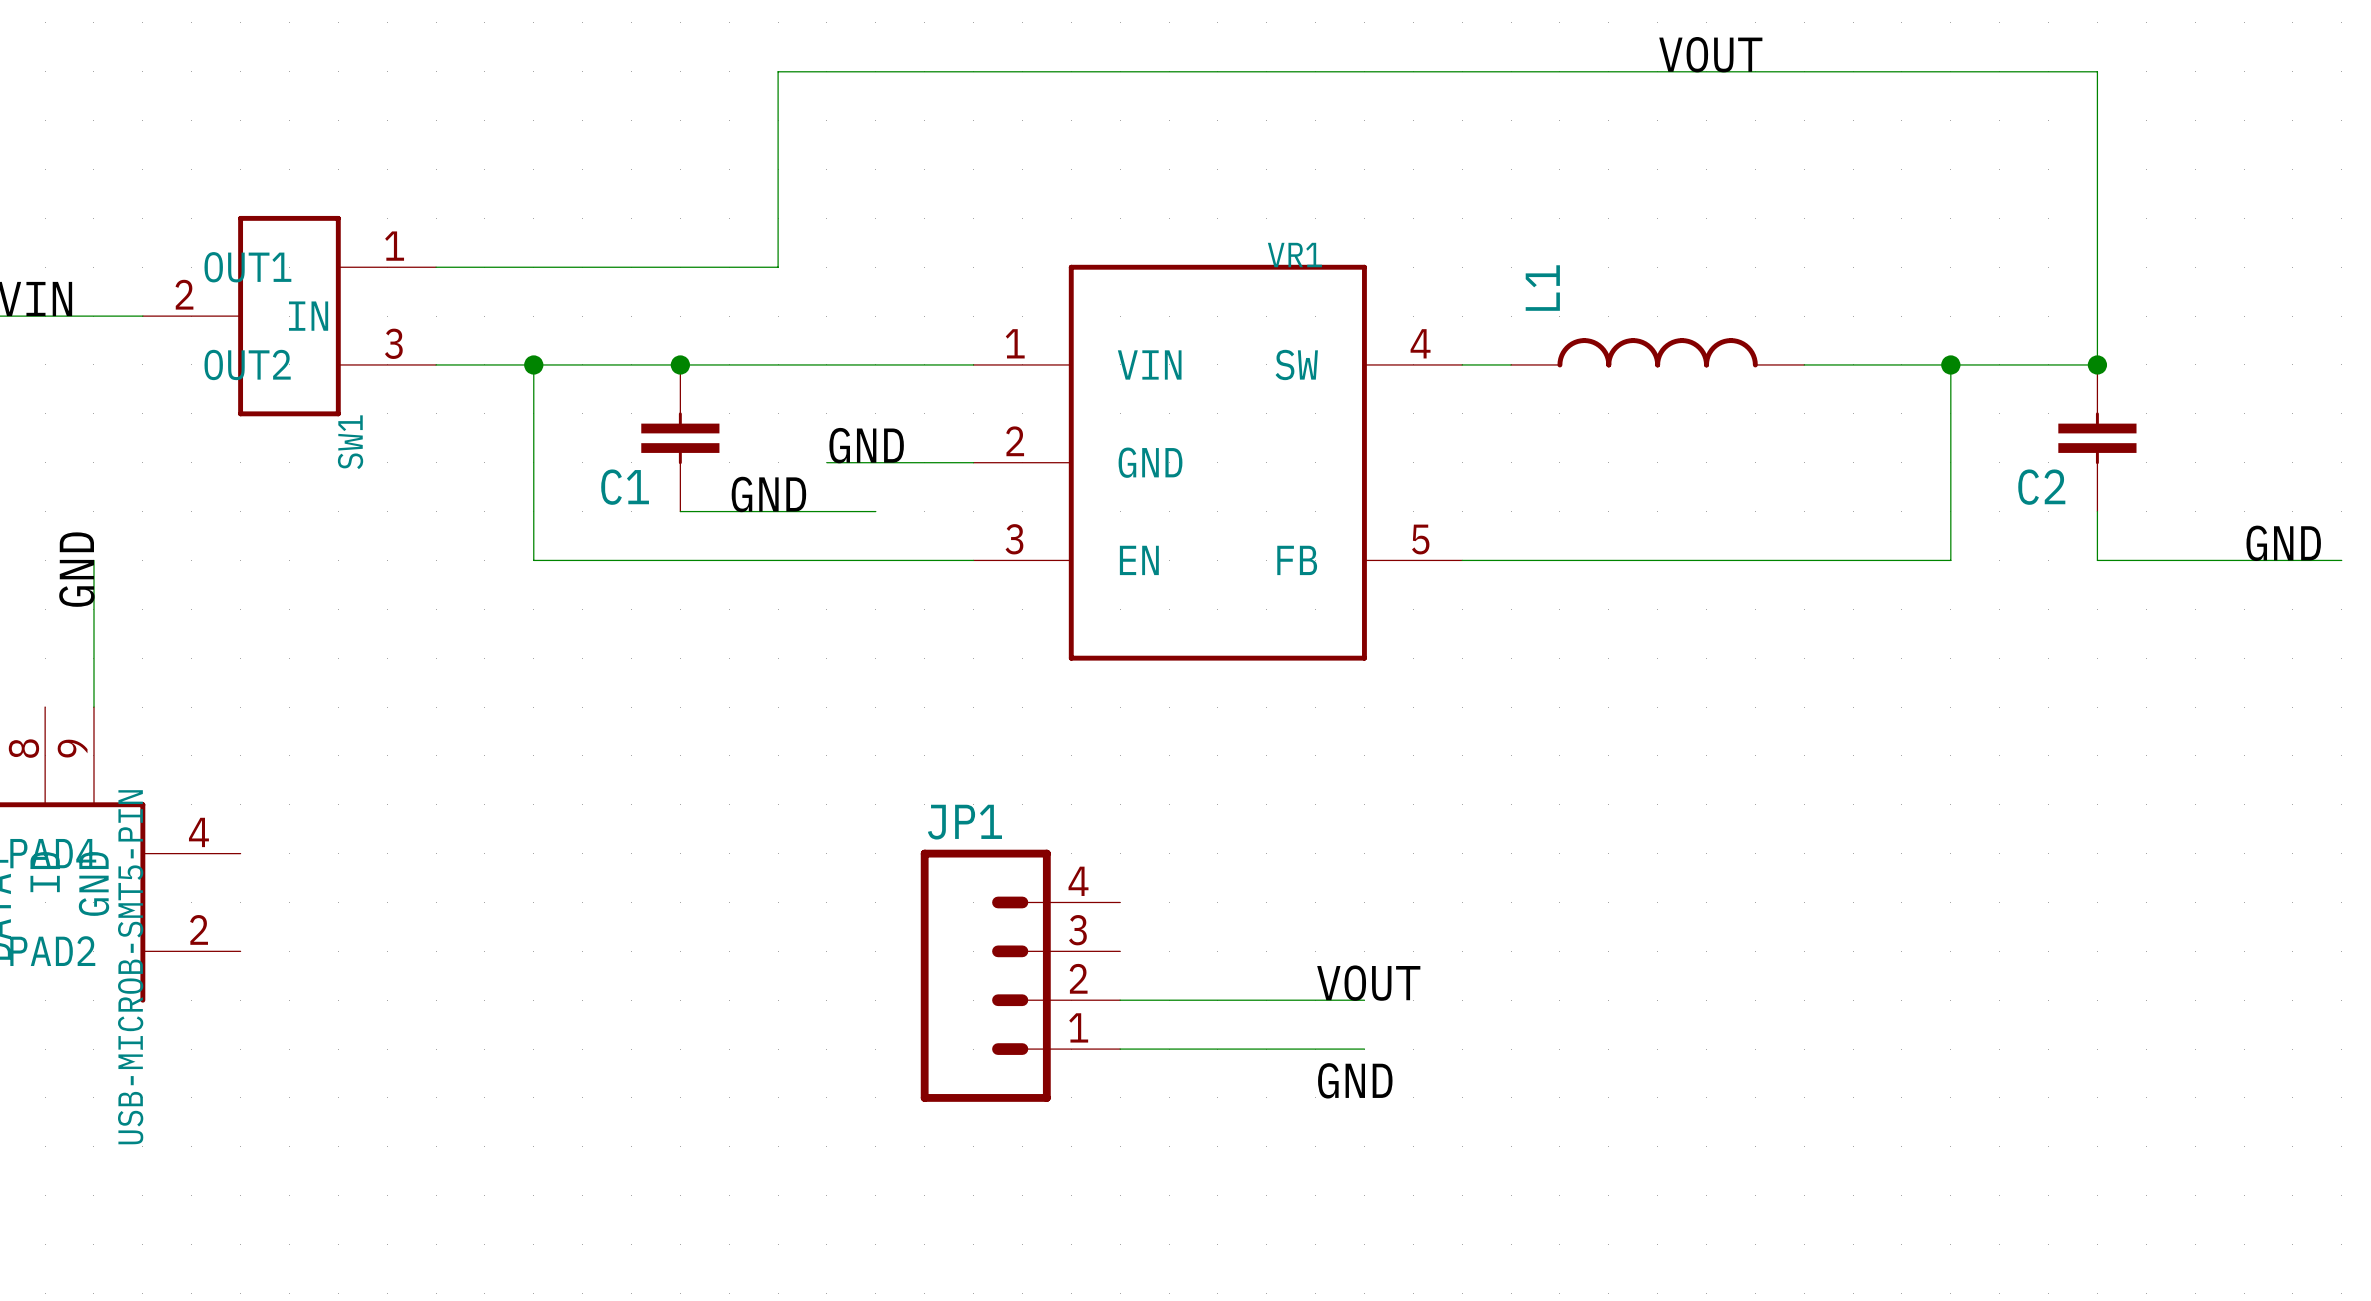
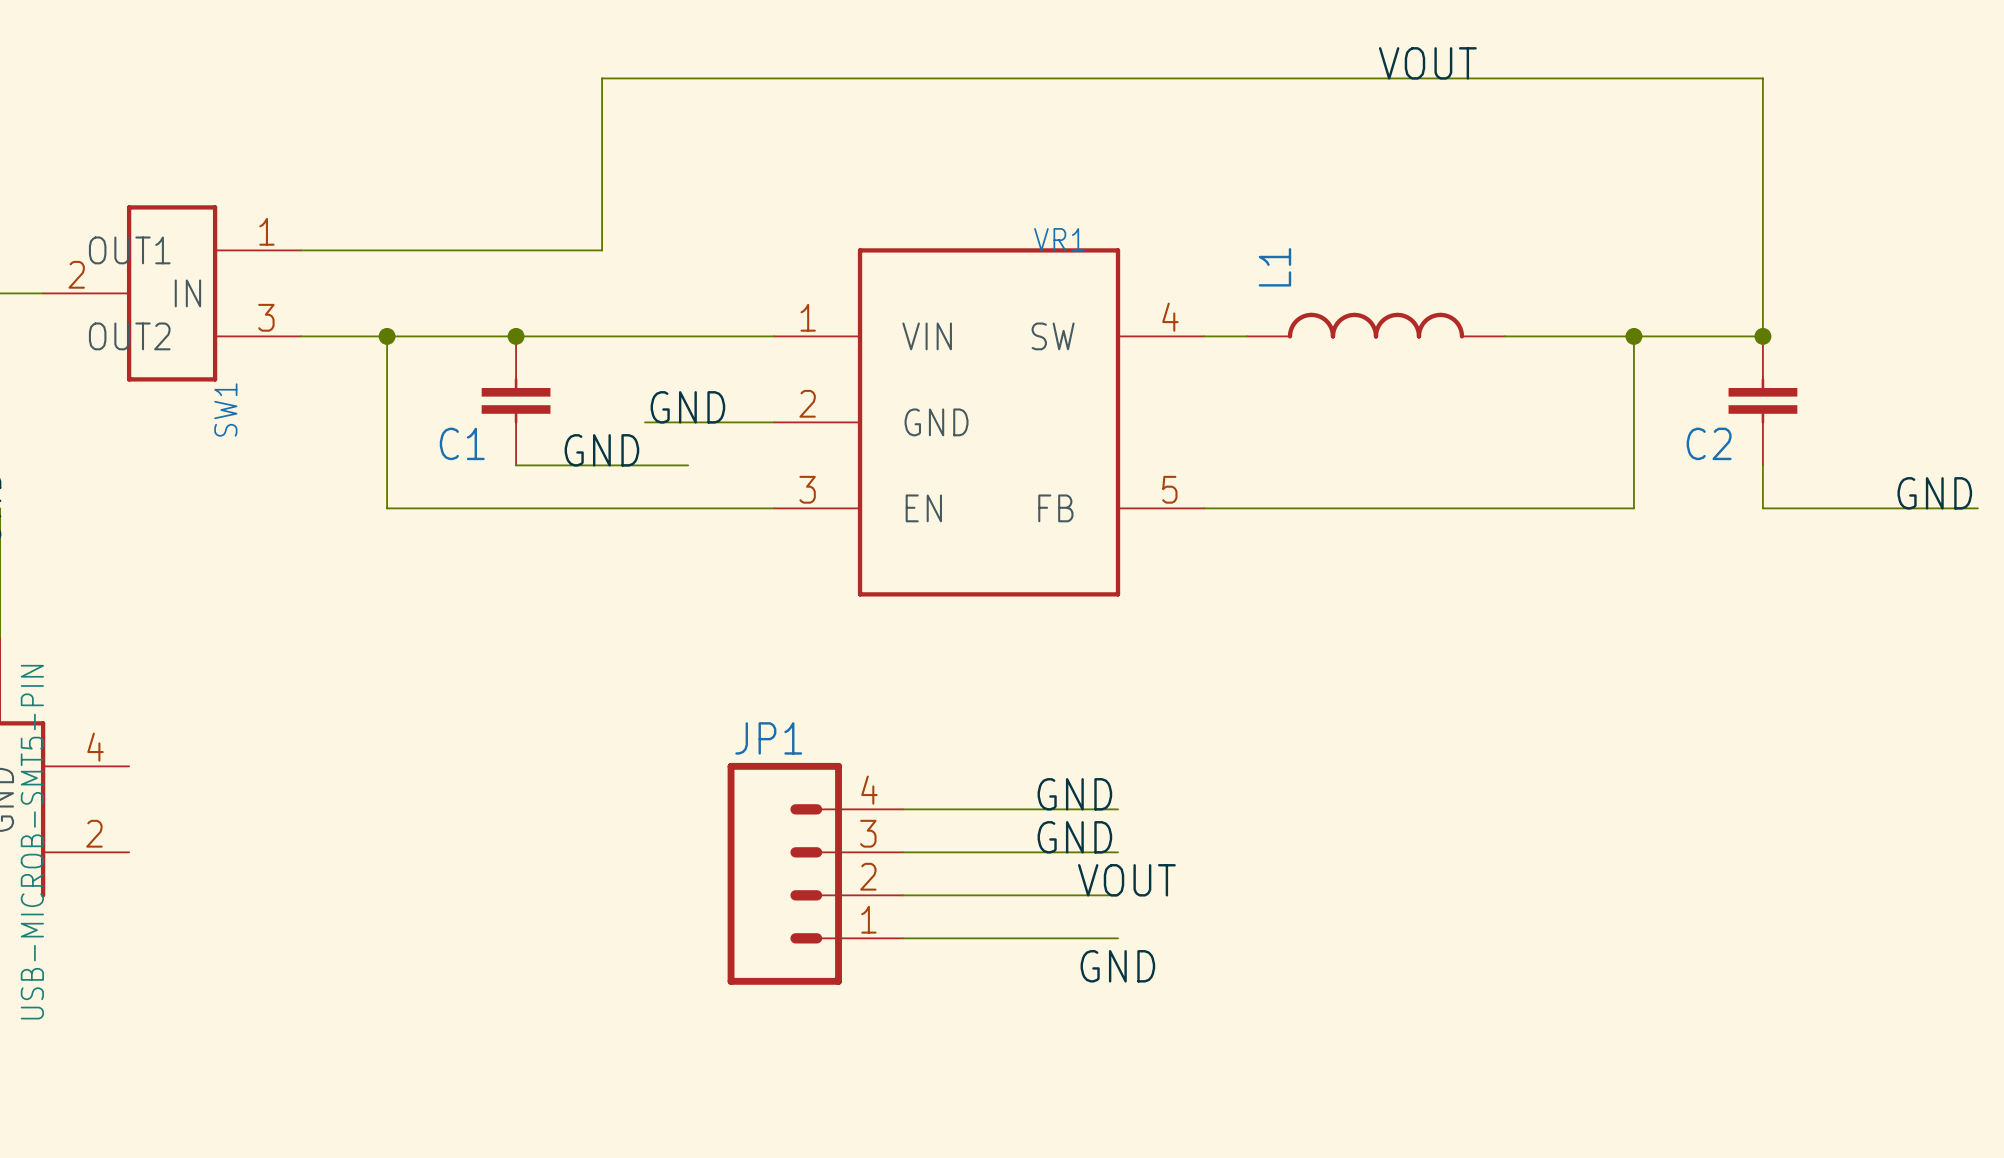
label: none -> GND (1074, 794)
wire: none -> (903, 809) (1118, 809)
label: none -> GND (1074, 837)
wire: none -> (903, 852) (1118, 852)

